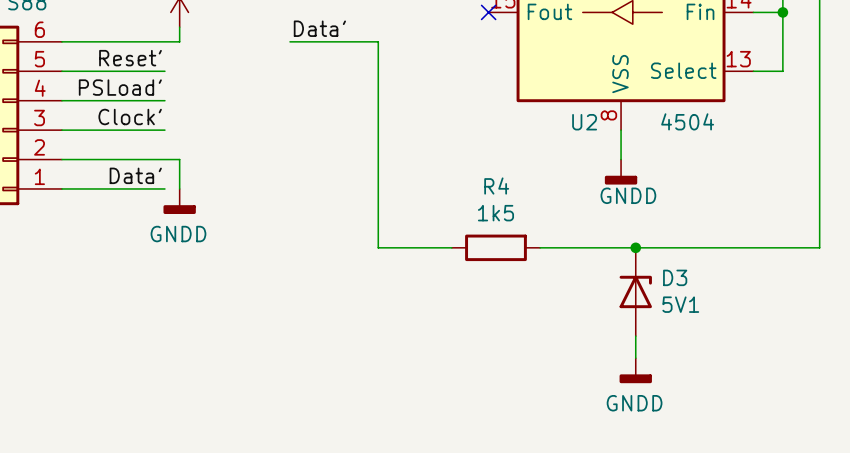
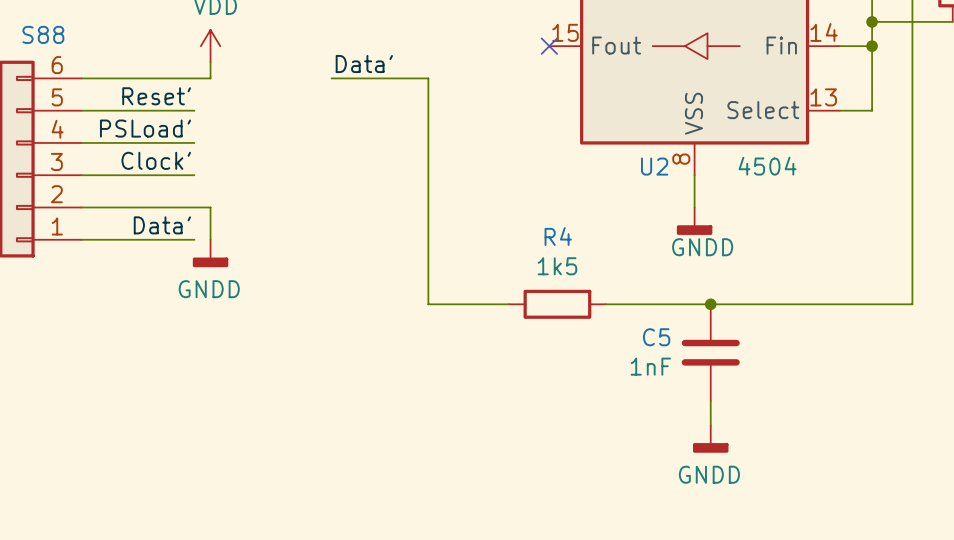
D3: 5V1 (635, 291) -> none
C5: none -> 1nF (710, 352)

